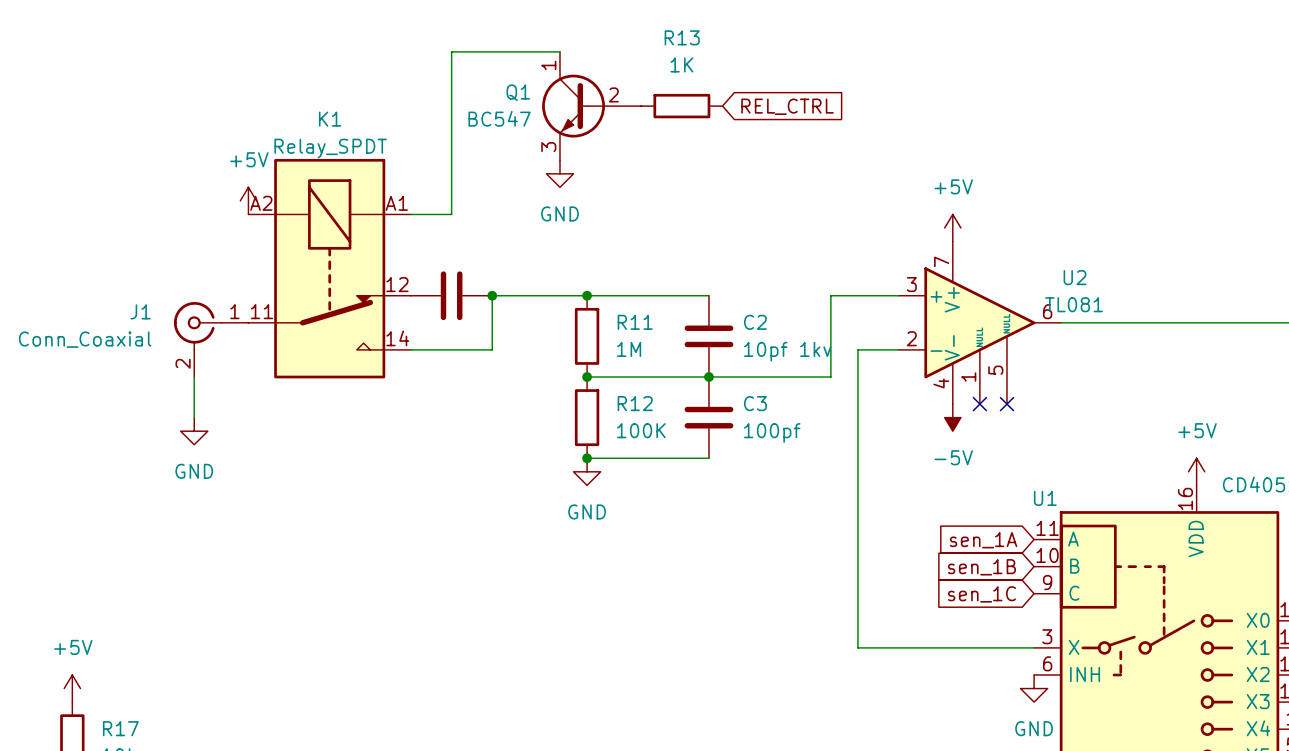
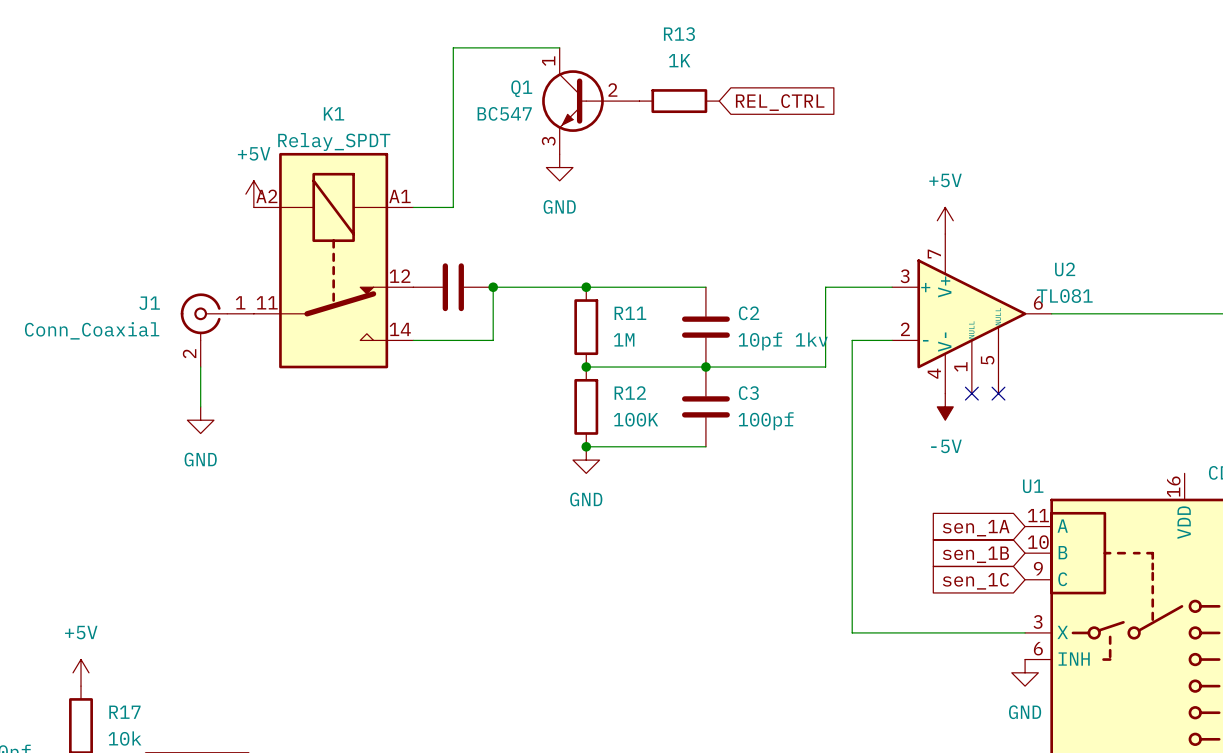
power symbol: +5V (1196, 471) -> none

